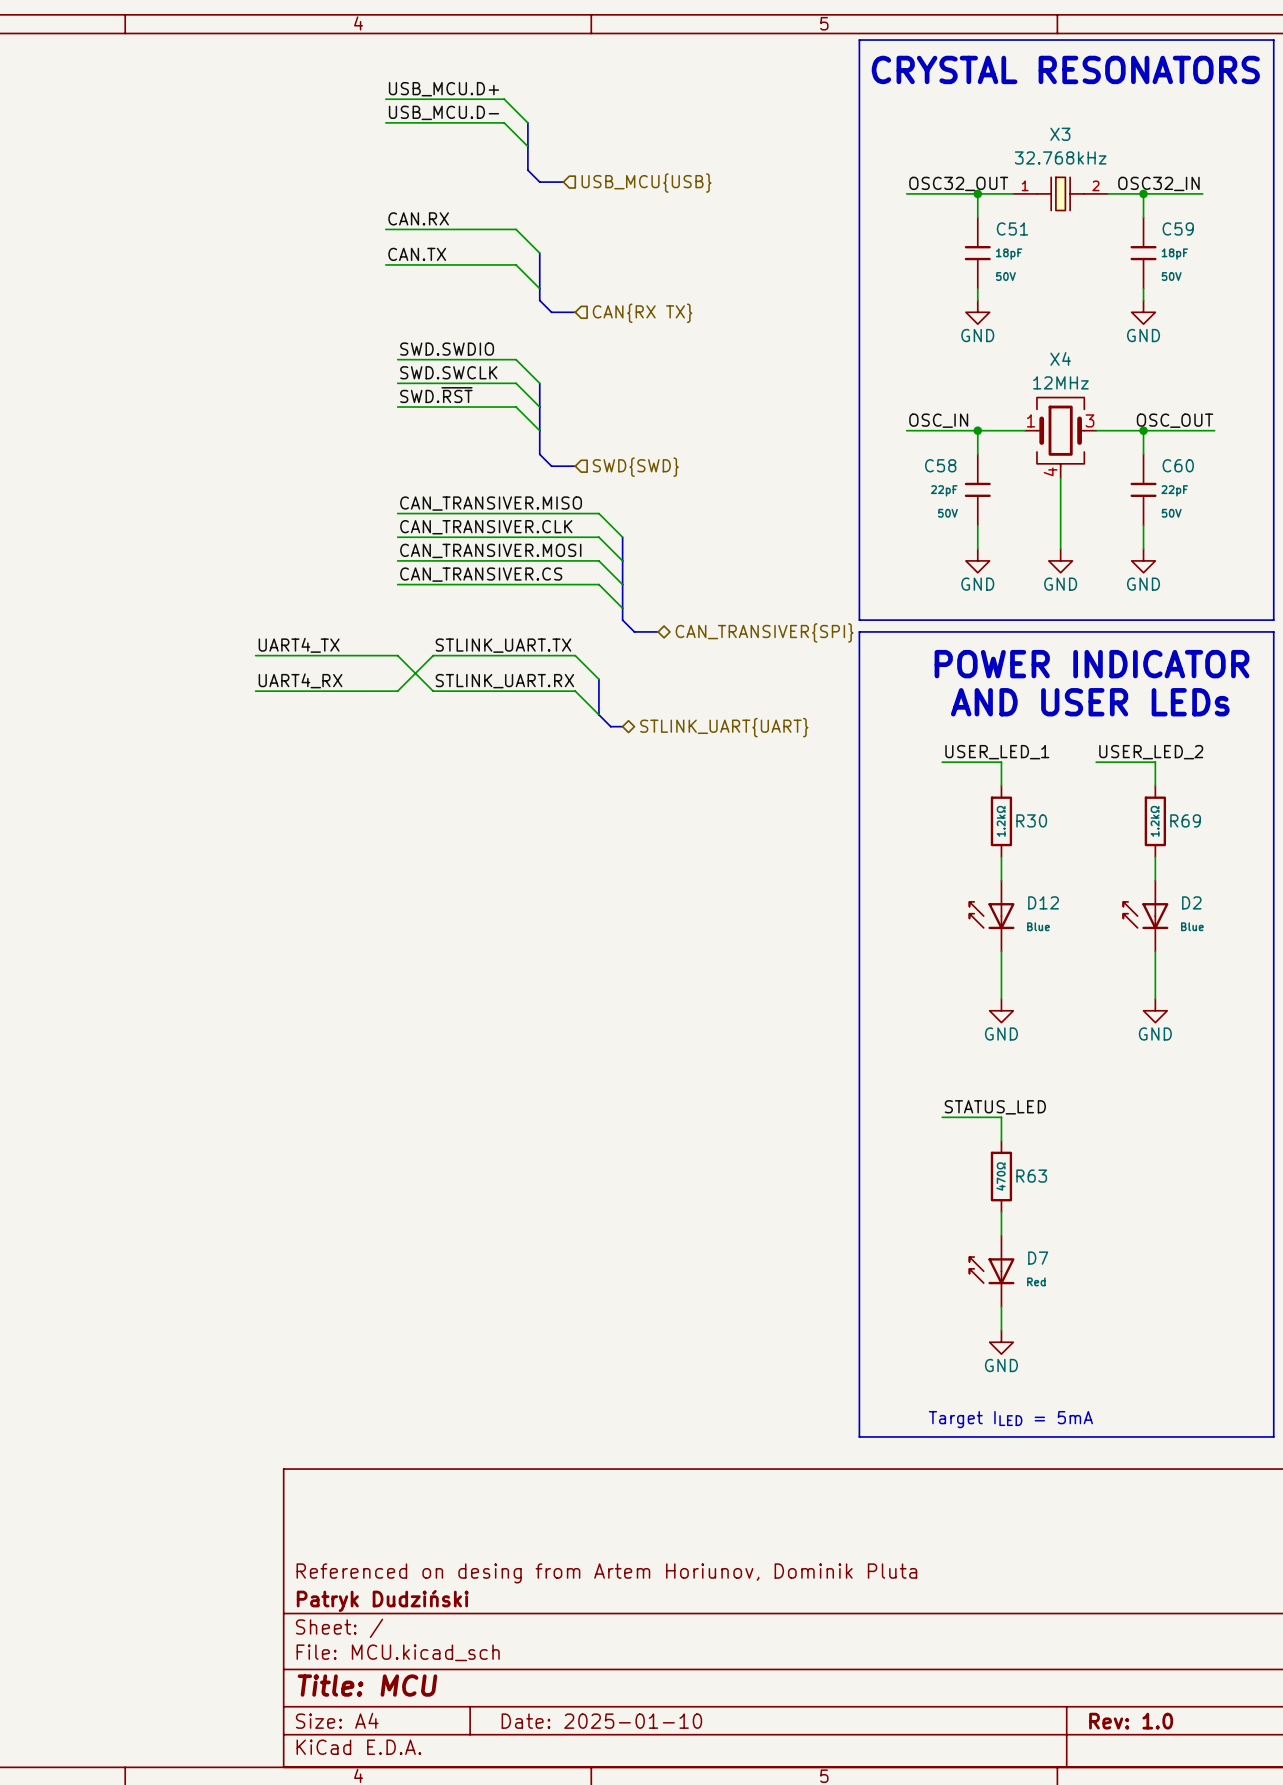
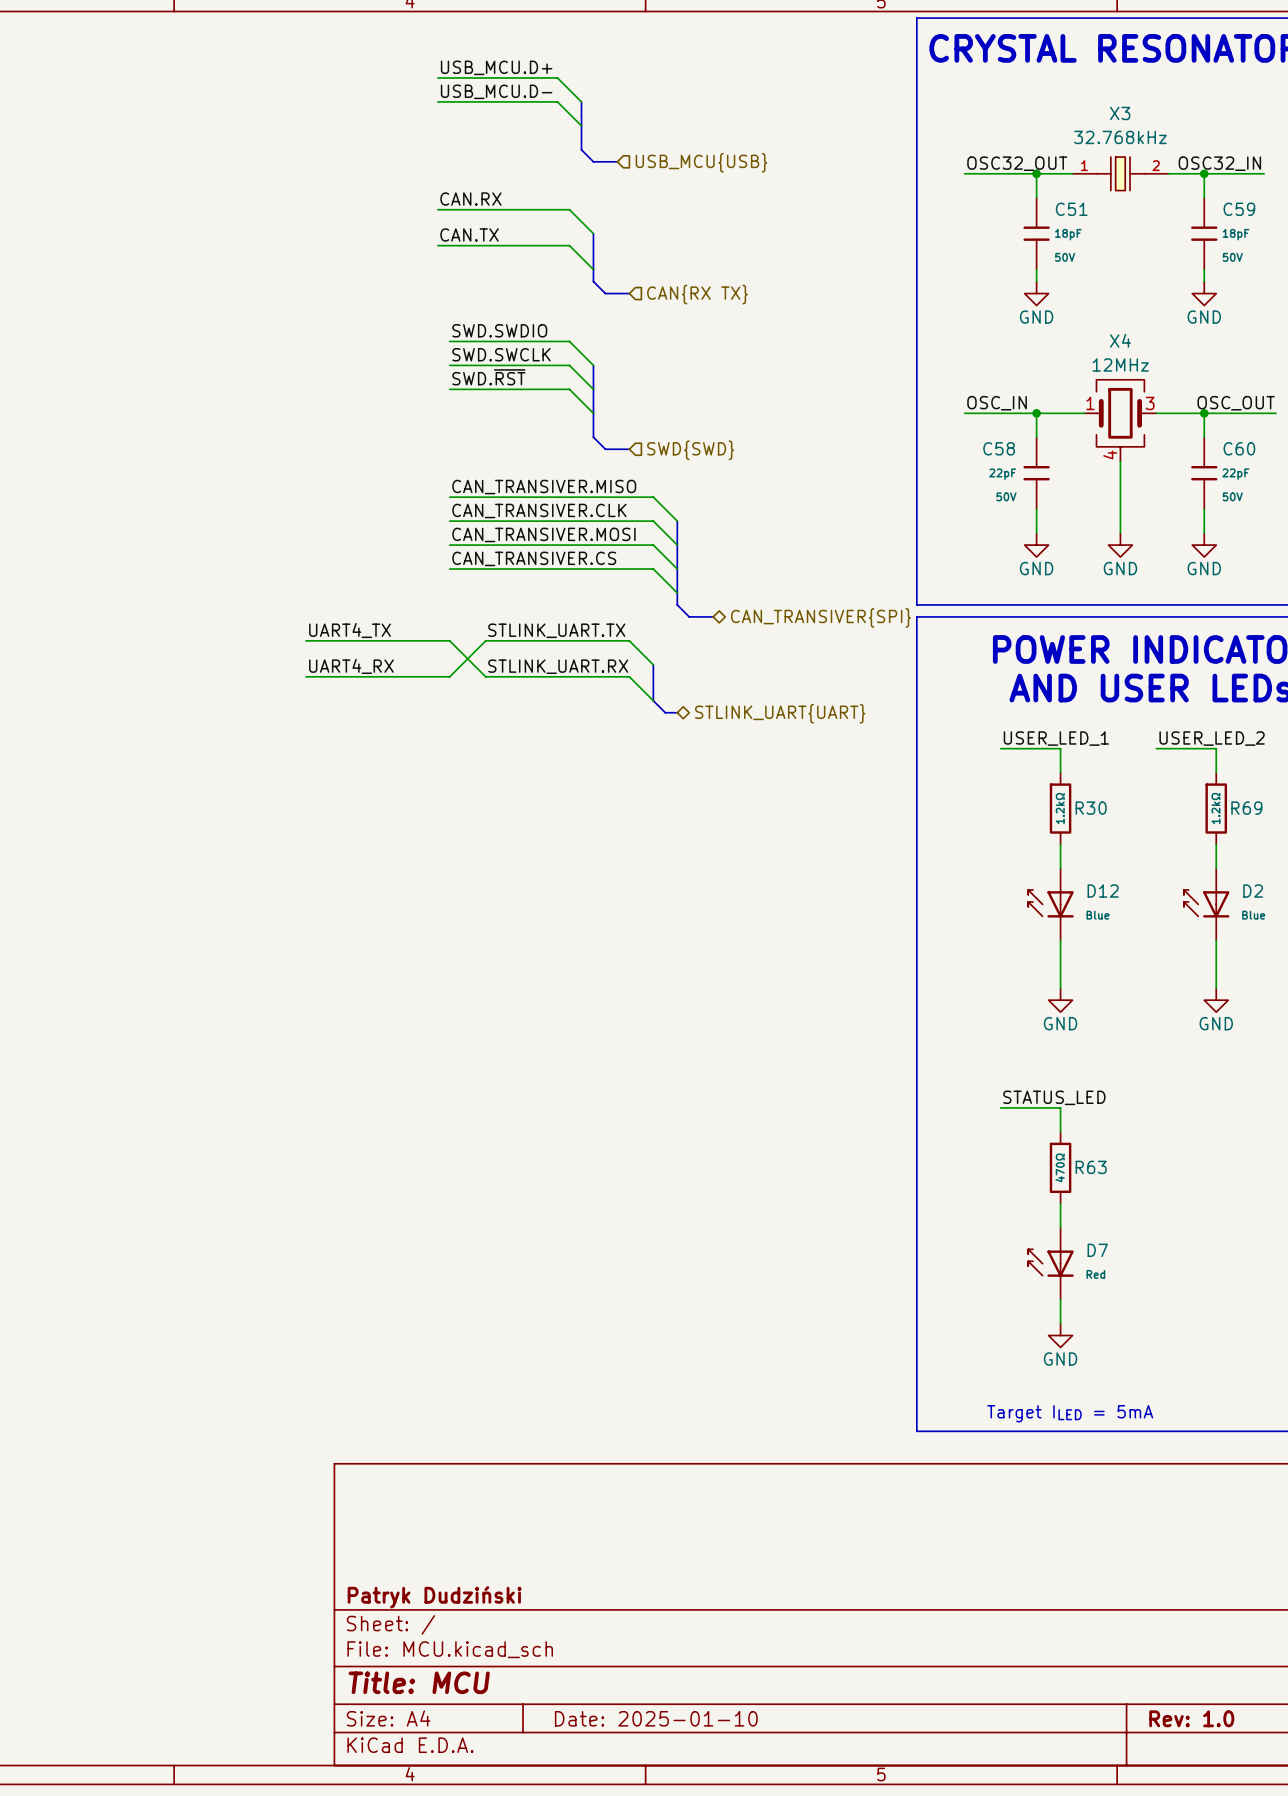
title block: Referenced on desing from Artem Horiunov, Dominik Pluta (606, 1573) -> none

